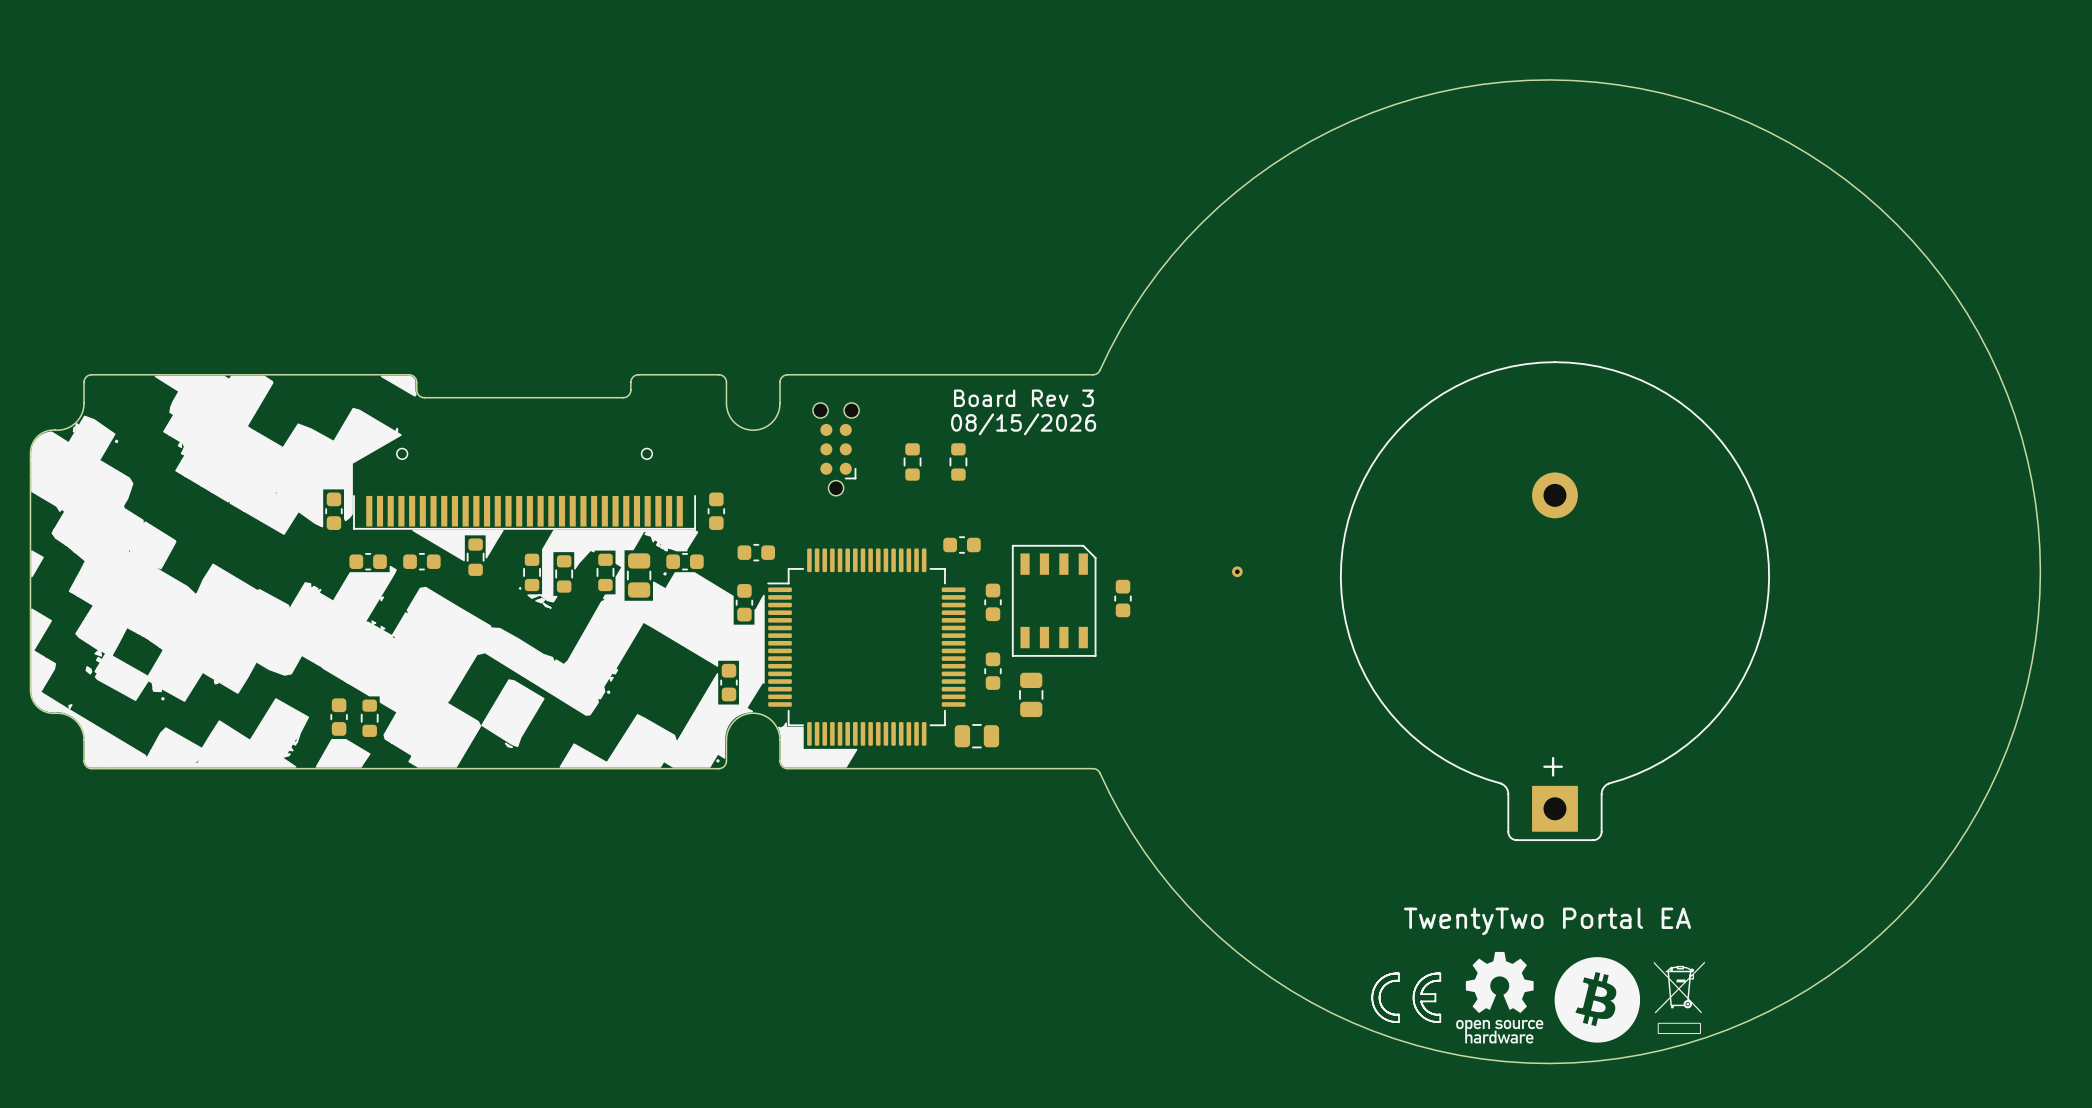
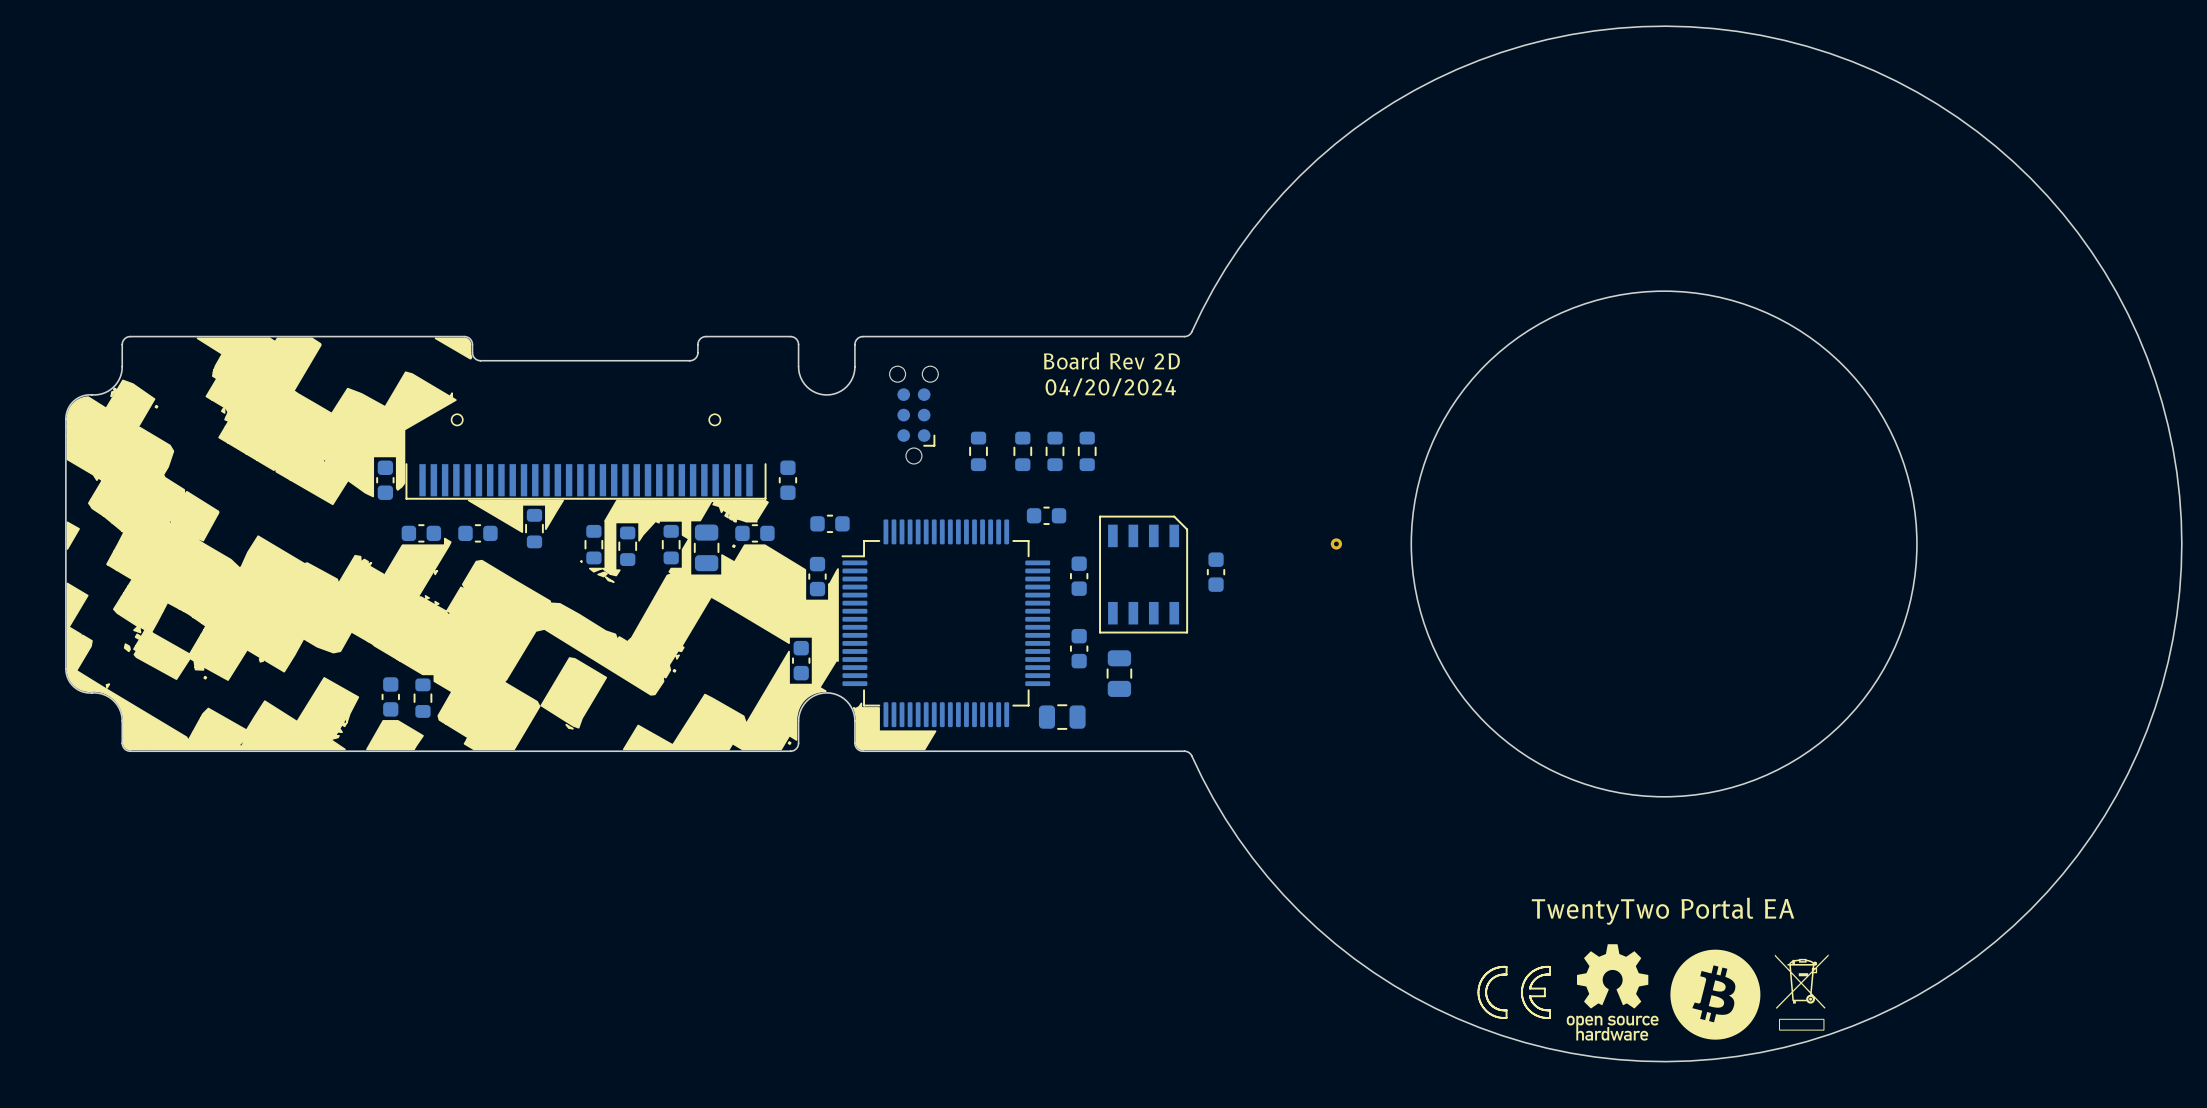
round board edge: none -> [1410, 290, 1918, 798]
text: Board Rev 3 (1023, 398) -> Board Rev 2D (1111, 360)
text: 08/15/2026 (1023, 424) -> 04/20/2024 (1110, 387)
part: (912, 461) -> none
part: (958, 461) -> none
part: none -> (978, 451)
part: none -> (1022, 451)
part: none -> (1055, 451)
part: none -> (1087, 451)
part: (1554, 601) -> none

